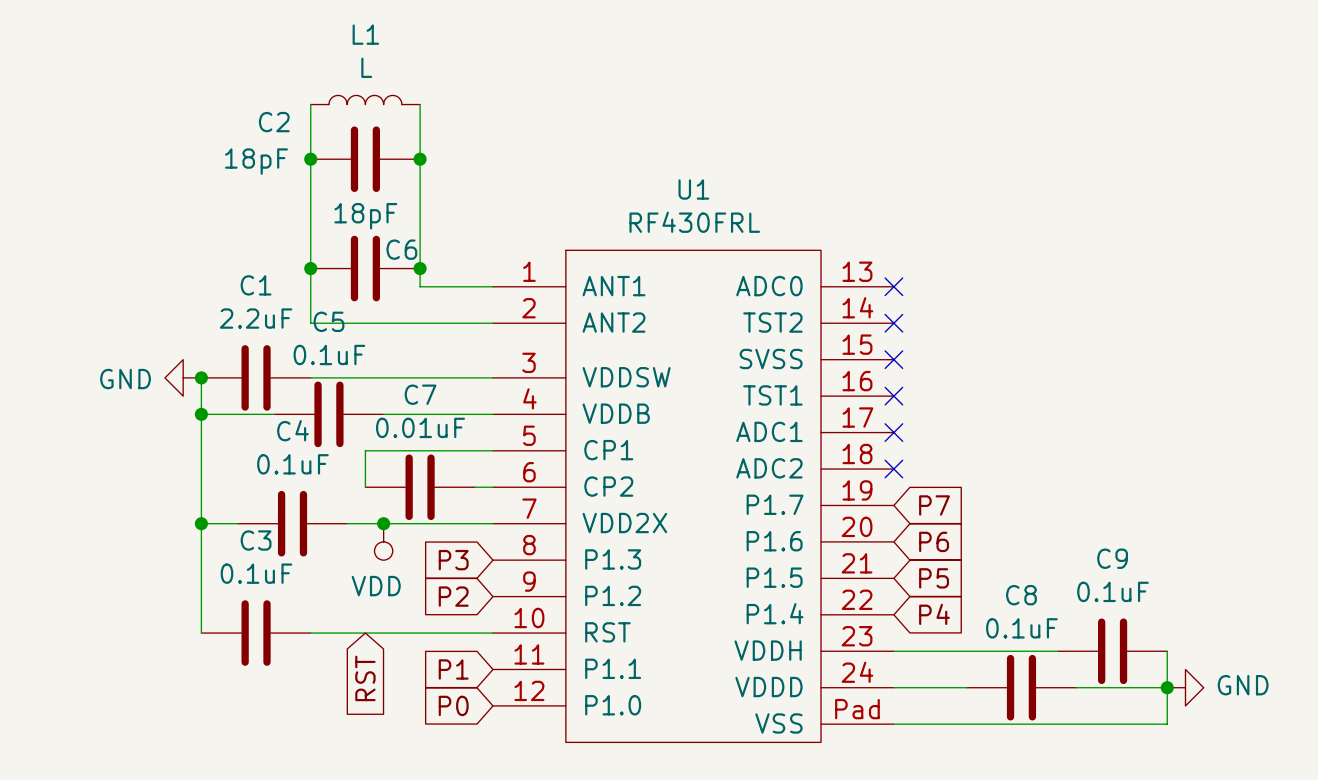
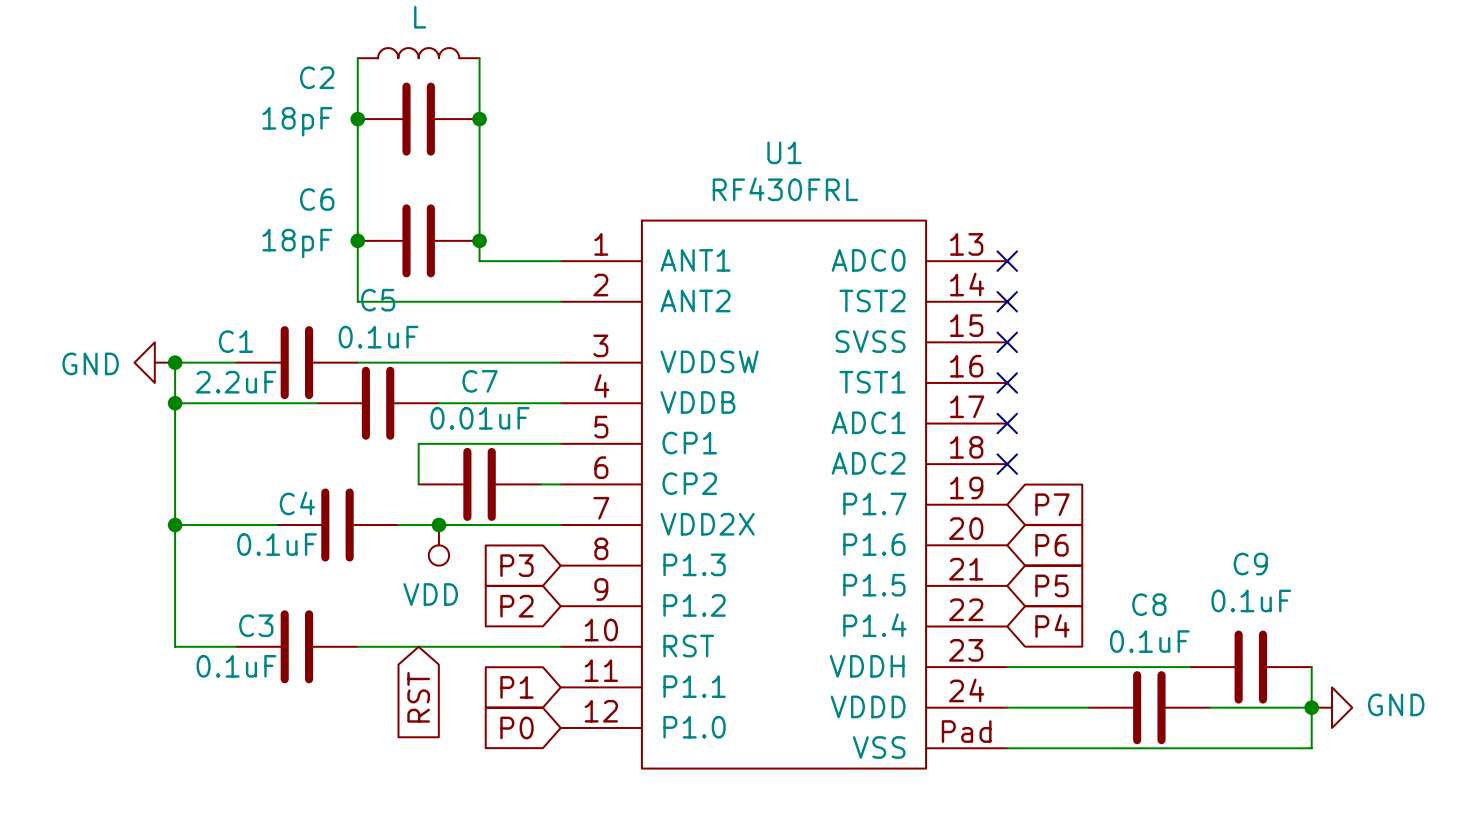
C6 value position: 18pF (365, 216) -> 18pF (297, 243)
C6 name position: C6 (401, 249) -> C6 (317, 199)
C1 name position: C1 (256, 285) -> C1 (236, 341)
C1 value position: 2.2uF (256, 318) -> 2.2uF (236, 382)
junction: none -> (175, 362)
power symbol position: GND (183, 377) -> GND (154, 362)
wire: (201, 377) (201, 633) -> (236, 362) (175, 362) (175, 646) (236, 646)
junction: (201, 377) -> none
wire: none -> (175, 403) (236, 403)
junction: none -> (175, 403)
junction: (201, 414) -> none
C4 name position: C4 (292, 430) -> C4 (297, 503)
C4 value position: 0.1uF (292, 464) -> 0.1uF (277, 544)
wire: none -> (175, 525) (236, 525)
junction position: (201, 523) -> (175, 525)
C3 name position: C3 (256, 540) -> C3 (256, 625)
C3 value position: 0.1uF (256, 573) -> 0.1uF (236, 666)

